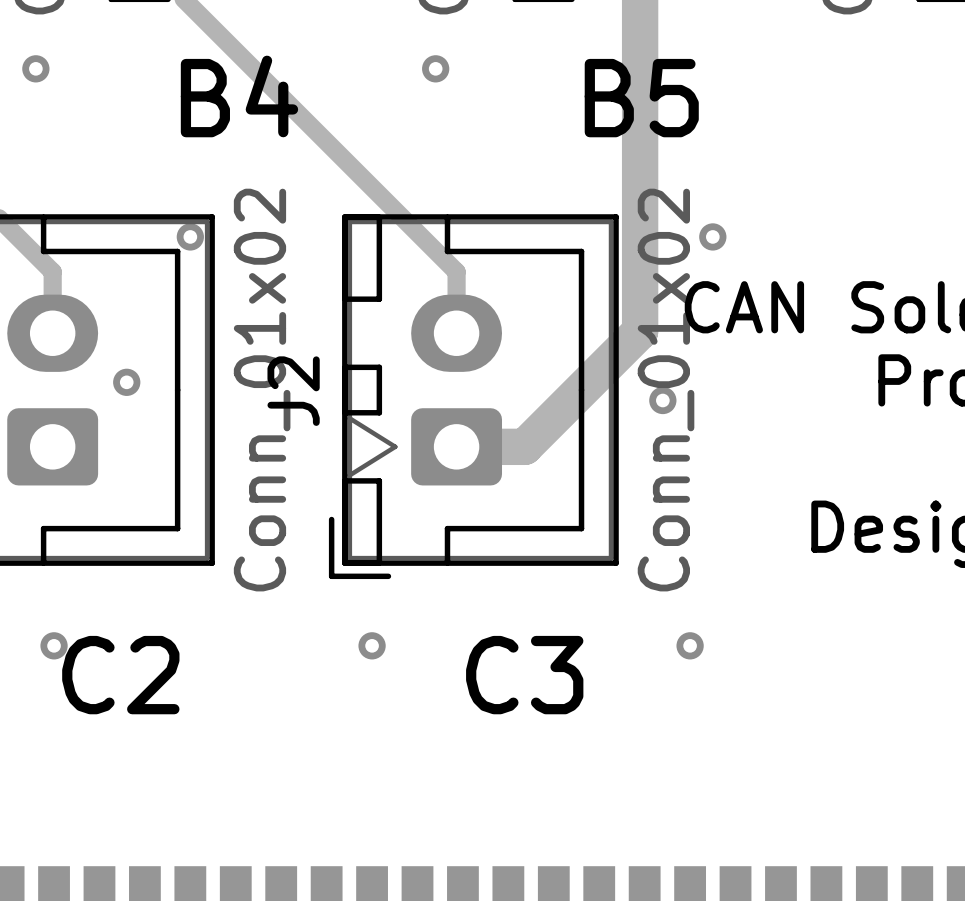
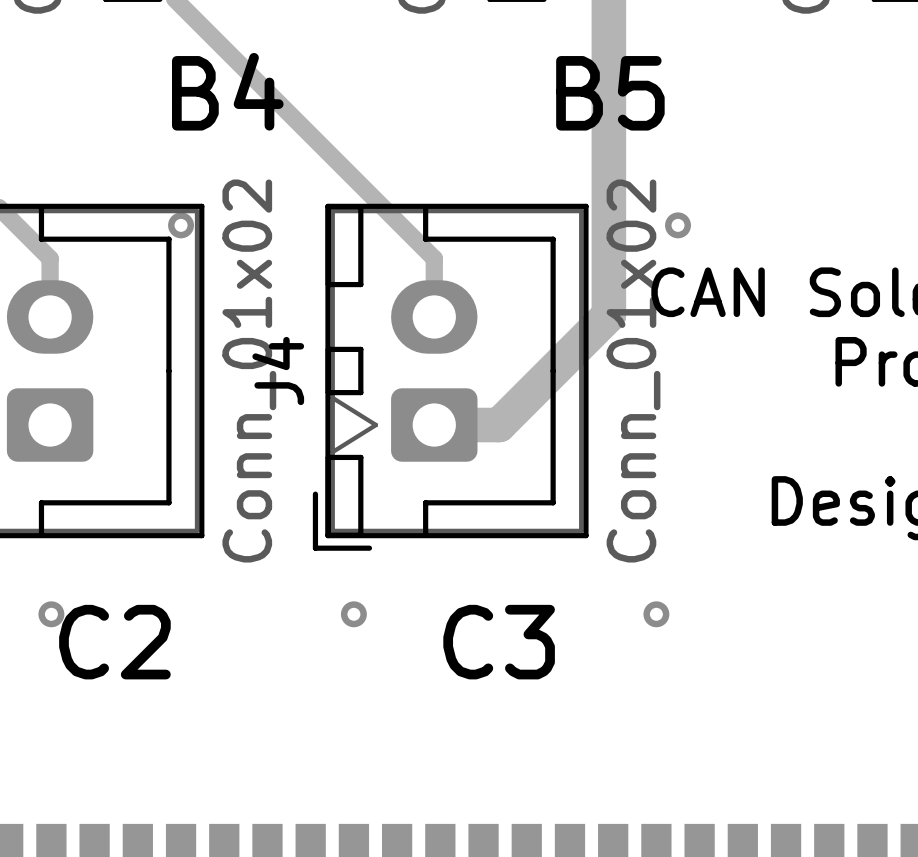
via: (35, 68) -> none
via: (435, 68) -> none
via: (126, 382) -> none
J2 name: J2 (293, 391) -> J4 (278, 371)
via: (662, 400) -> none

